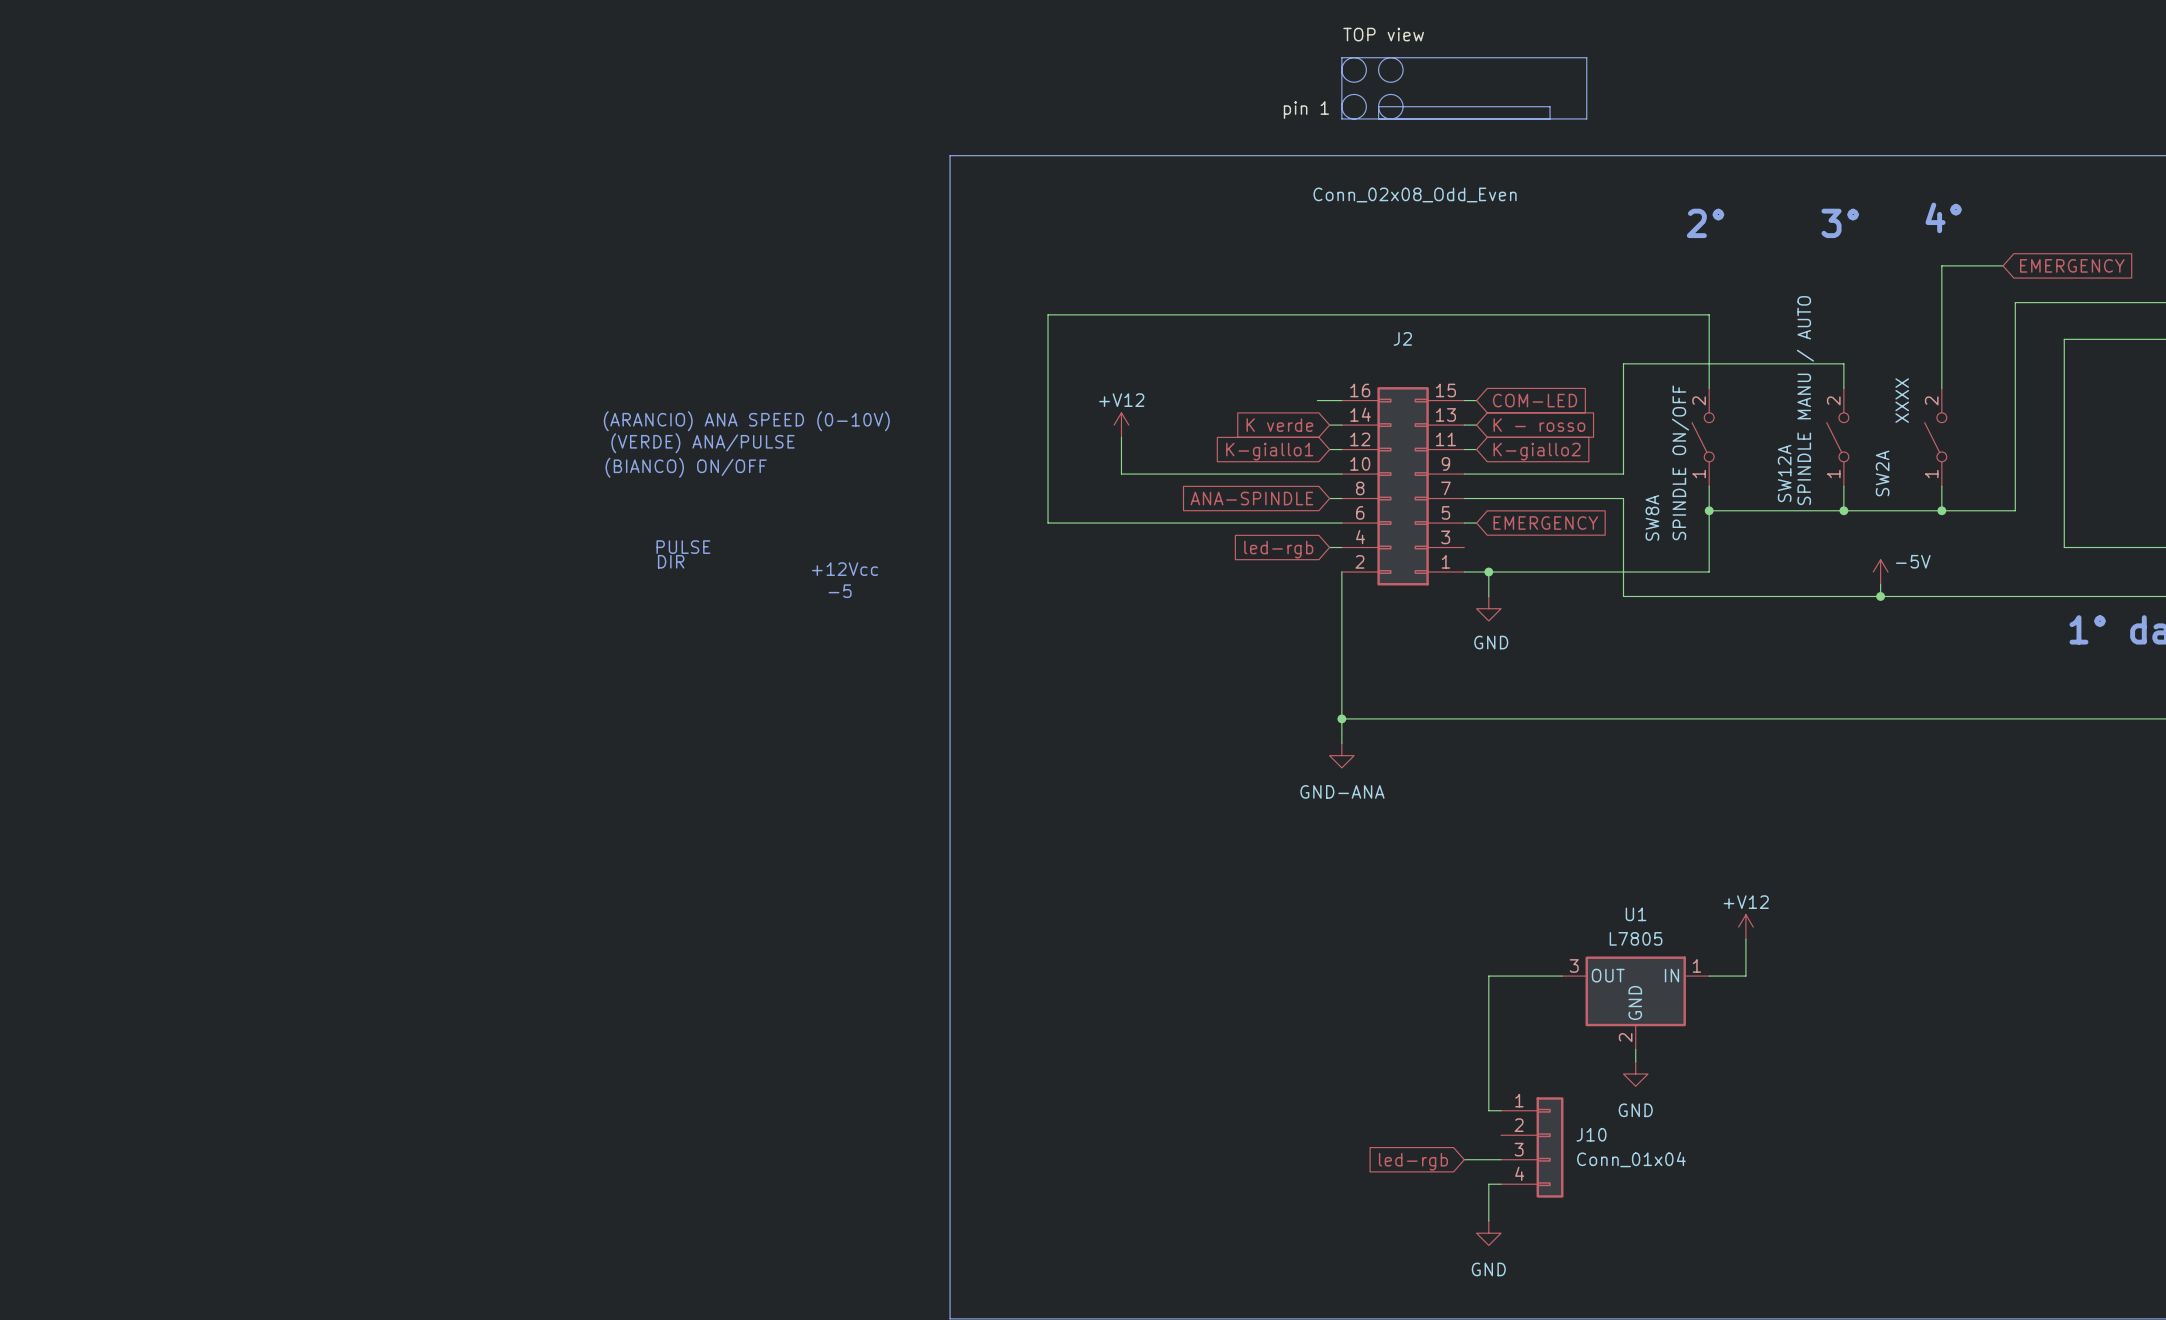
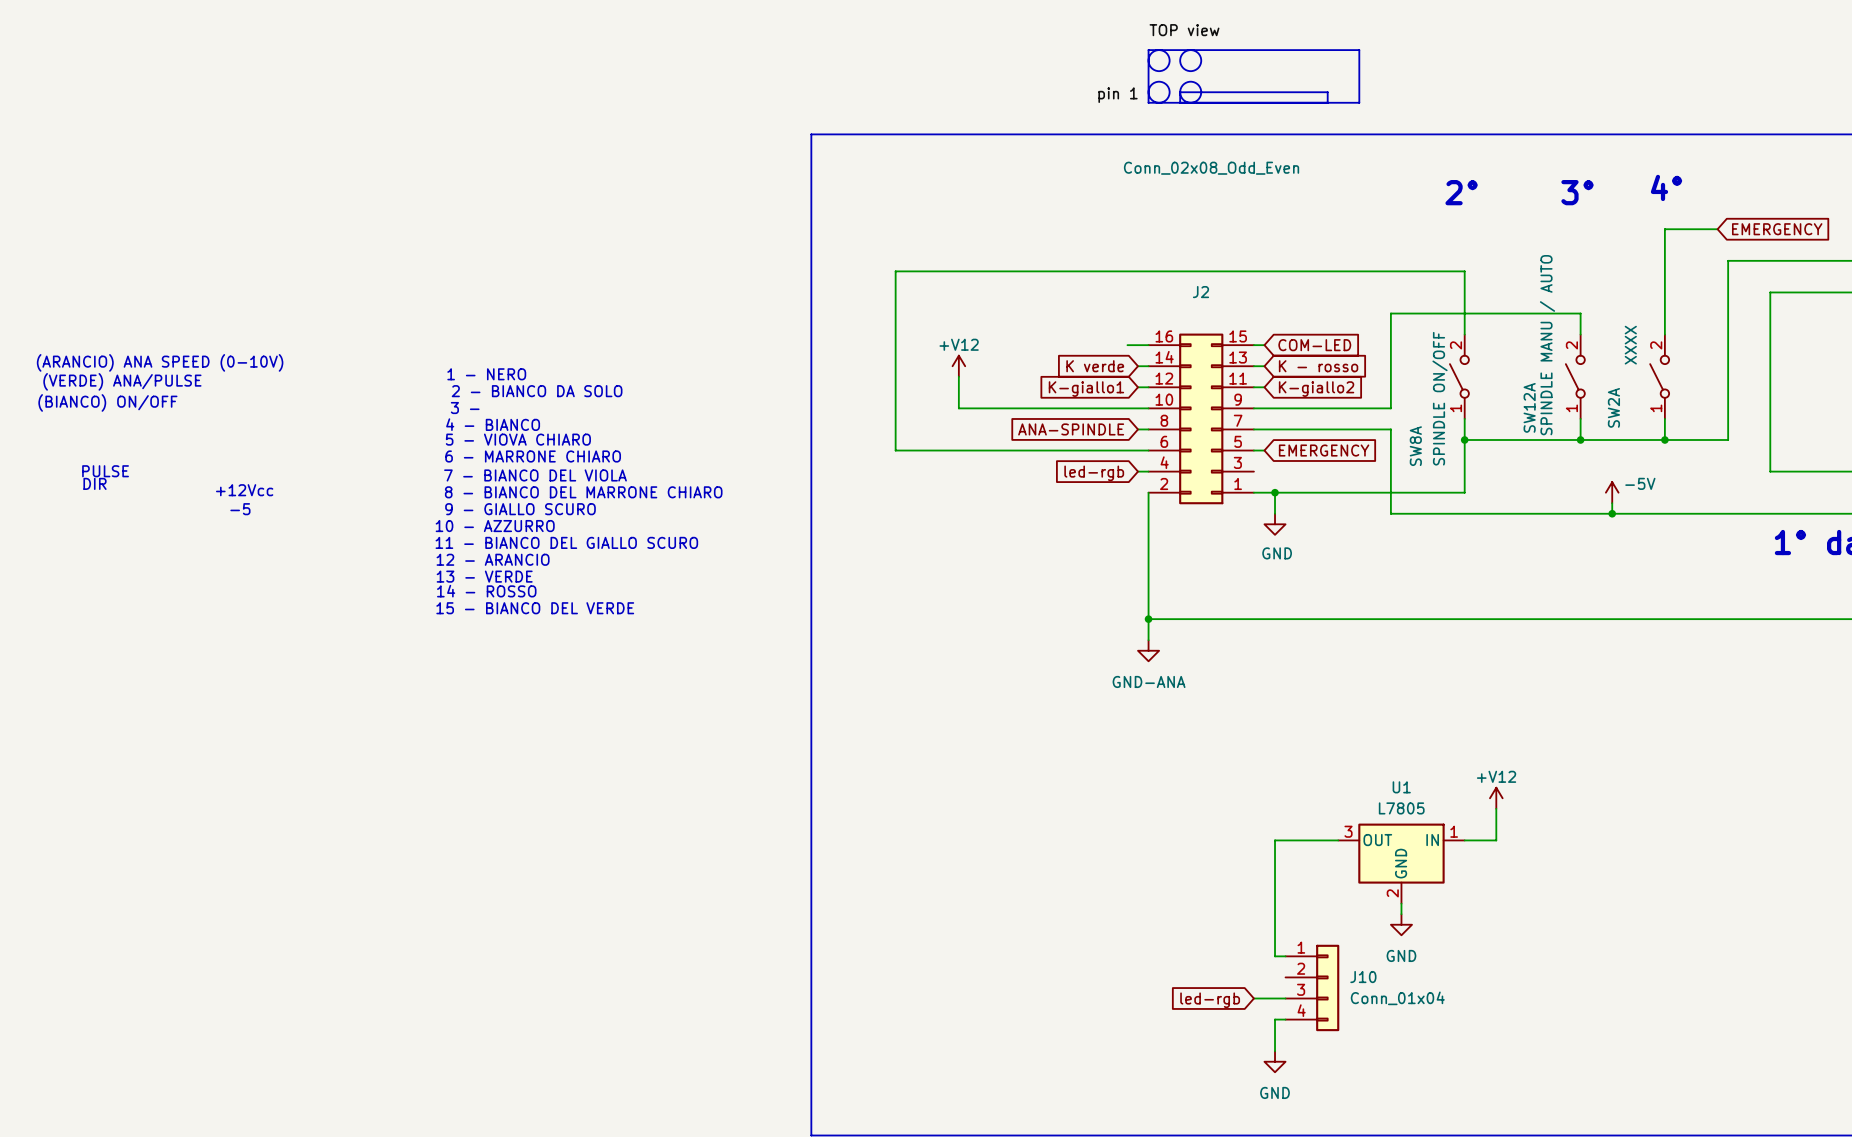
text: none -> (ARANCIO) ANA SPEED (0-10V) (160, 362)
text: (ARANCIO) ANA SPEED (0-10V) (746, 421) -> none
text: none -> 1 - NERO (486, 374)
text: none -> (VERDE) ANA/PULSE (122, 381)
text: (VERDE) ANA/PULSE (703, 443) -> none
text: none -> 2 - BIANCO DA SOLO (537, 391)
text: none -> (BIANCO) ON/OFF (107, 402)
text: (BIANCO) ON/OFF (686, 467) -> none
text: none -> 3 - (465, 408)
text: none -> 4 - BIANCO (493, 424)
text: none -> 5 - VIOVA CHIARO (518, 439)
text: none -> 6 - MARRONE CHIARO (533, 456)
text: none -> PULSE (105, 471)
text: PULSE (683, 547) -> none
text: none -> 7 - BIANCO DEL VIOLA (535, 475)
text: none -> DIR (95, 483)
text: DIR (671, 561) -> none
text: none -> +12Vcc (244, 490)
text: +12Vcc (845, 569) -> none
text: none -> 8 - BIANCO DEL MARRONE CHIARO (583, 492)
text: none -> -5 (240, 509)
text: none -> 9 - GIALLO SCURO (520, 509)
text: -5 (840, 591) -> none
text: none -> 10 - AZZURRO (495, 526)
text: none -> 11 - BIANCO DEL GIALLO SCURO (566, 542)
text: none -> 12 - ARANCIO (493, 559)
text: none -> 13 - VERDE (484, 576)
text: none -> 14 - ROSSO (486, 591)
text: none -> 15 - BIANCO DEL VERDE (535, 608)

